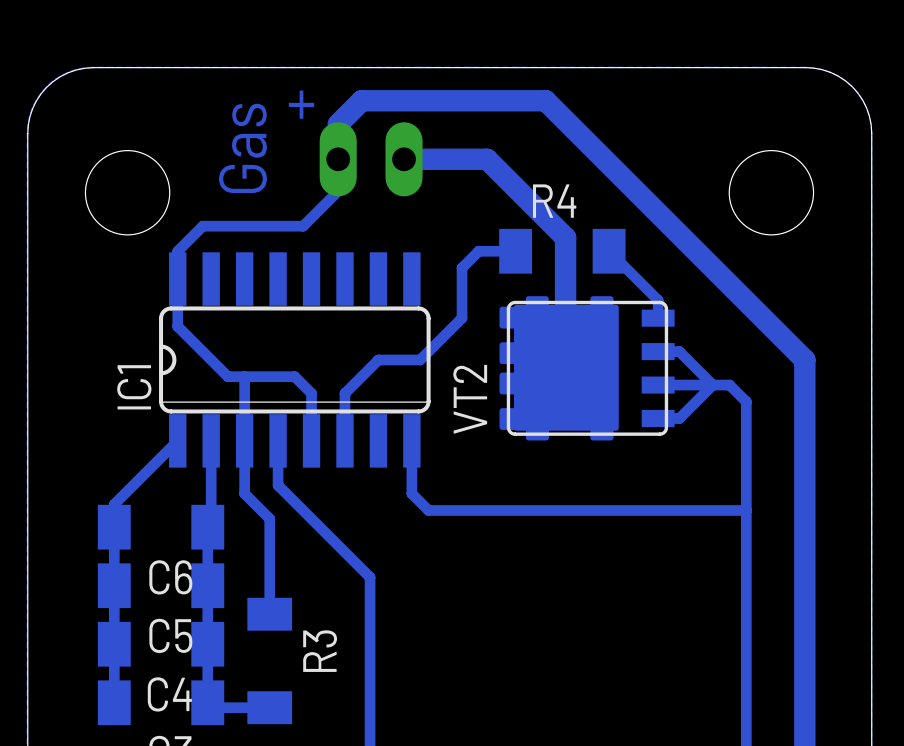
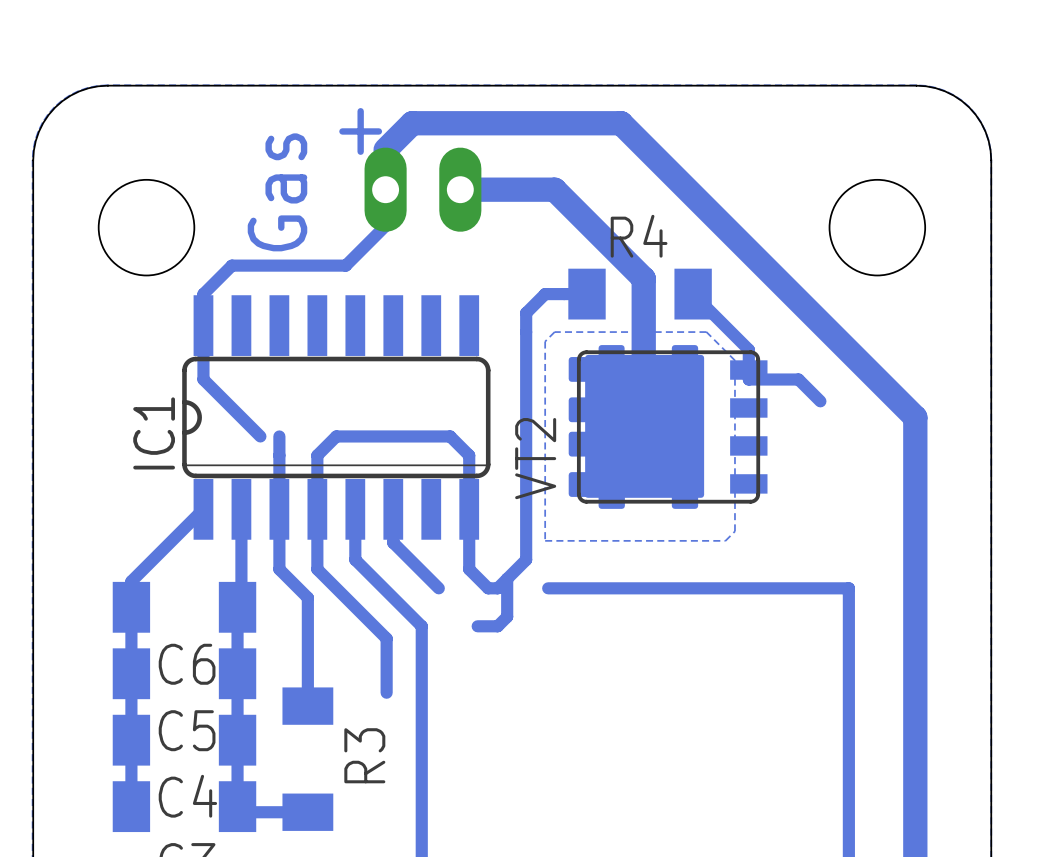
bottom zone outline: none -> (706, 332) (734, 360) (734, 531) (725, 540) (545, 540) (545, 341) (554, 332) (706, 332)
bottom track: (462, 318) (420, 359) (378, 359) (344, 393) (344, 440) -> (526, 370) (526, 559) (497, 588)
bottom track: none -> (748, 370) (748, 379) (798, 379) (820, 401)
bottom track: (658, 351) (679, 351) (712, 385) (679, 418) (658, 418) -> none
bottom track: (227, 376) (294, 376) (311, 393) (311, 440) -> (421, 664) (421, 626) (355, 559) (355, 509)
bottom track: (658, 385) (729, 385) (746, 401) (746, 510) -> none
bottom track: none -> (393, 509) (393, 542) (438, 588)
bottom track: none -> (469, 509) (469, 455) (450, 436) (336, 436) (317, 455) (317, 509)
bottom track: (278, 485) (370, 577) -> (317, 559) (317, 569) (386, 638) (386, 692)
bottom track: none -> (507, 578) (507, 616) (497, 626) (477, 626)
bottom track: (481, 510) (436, 510) -> none

